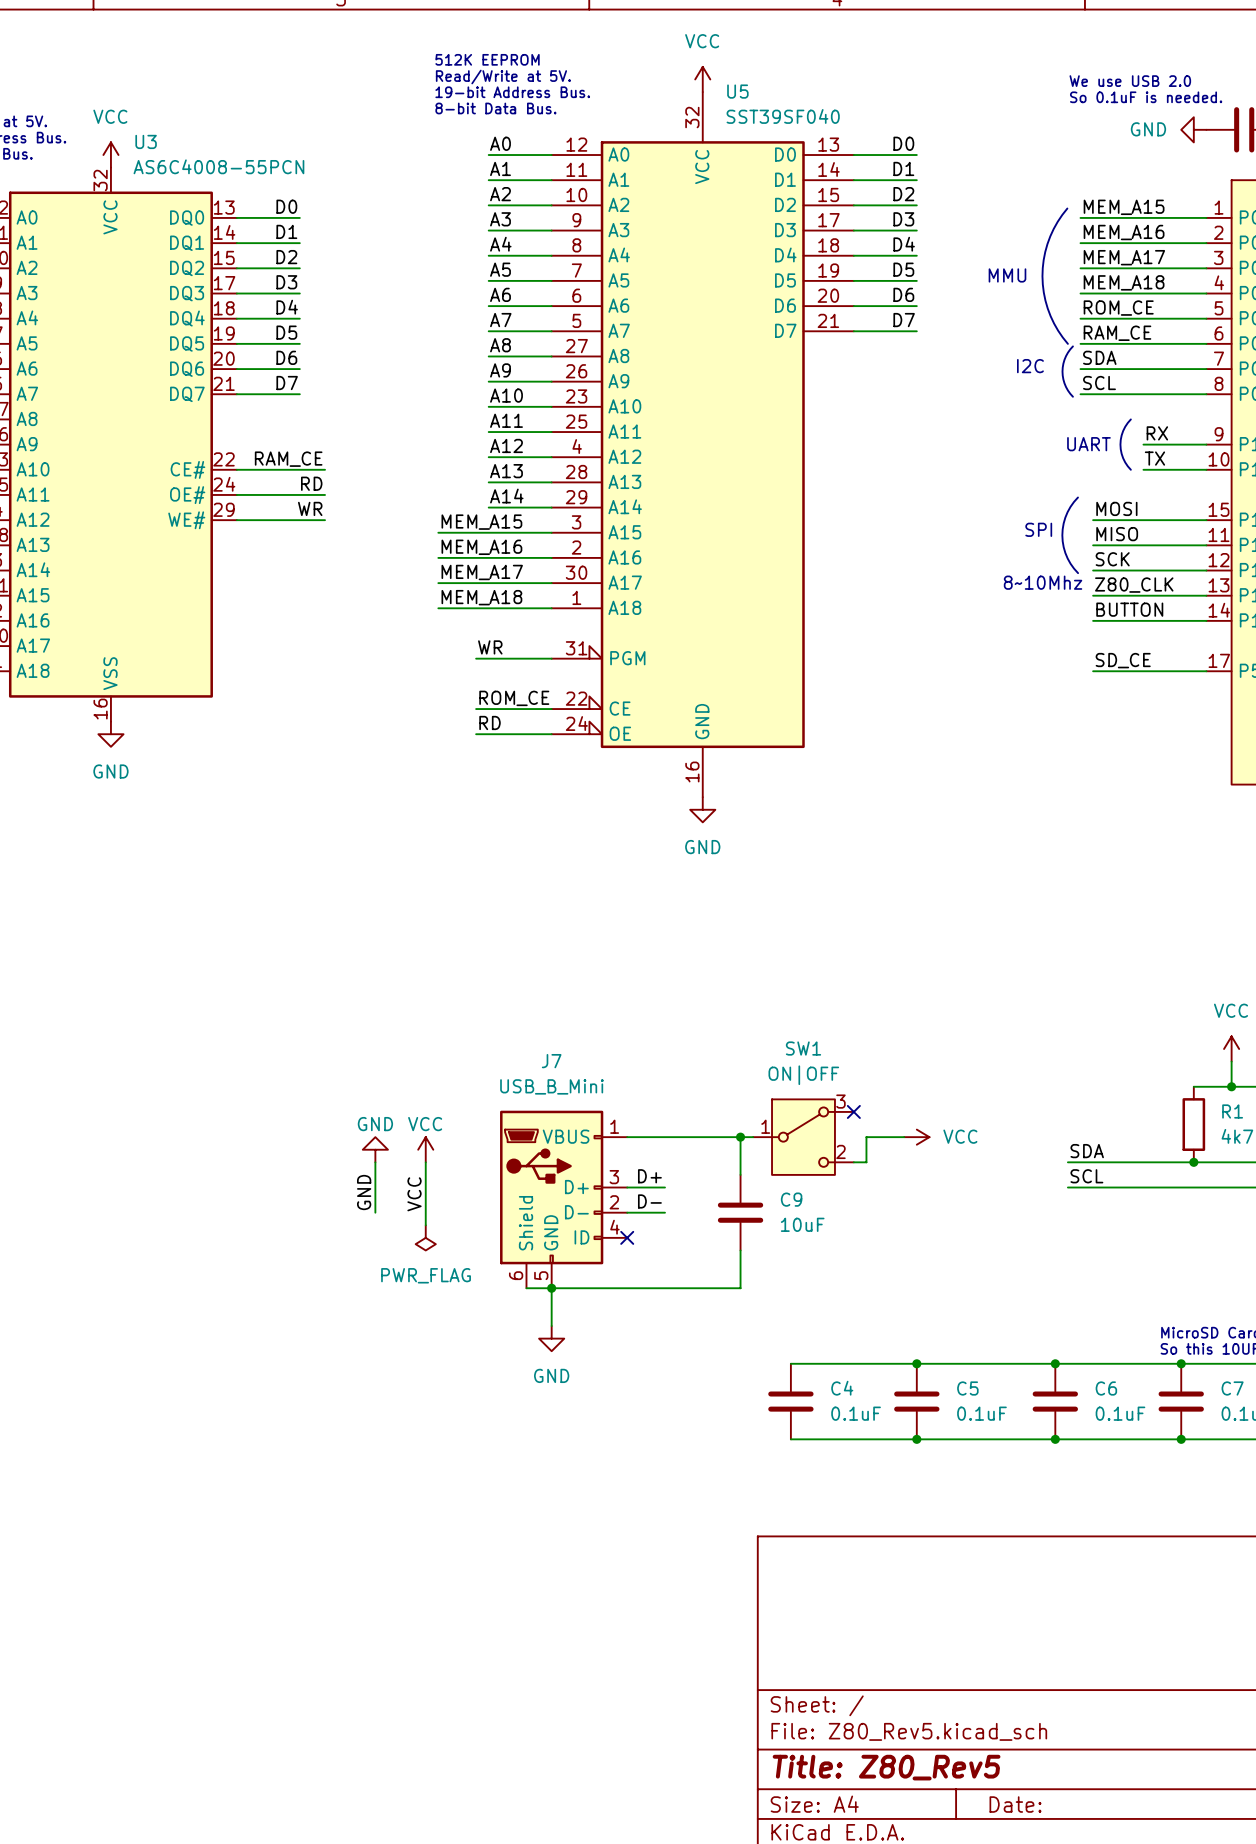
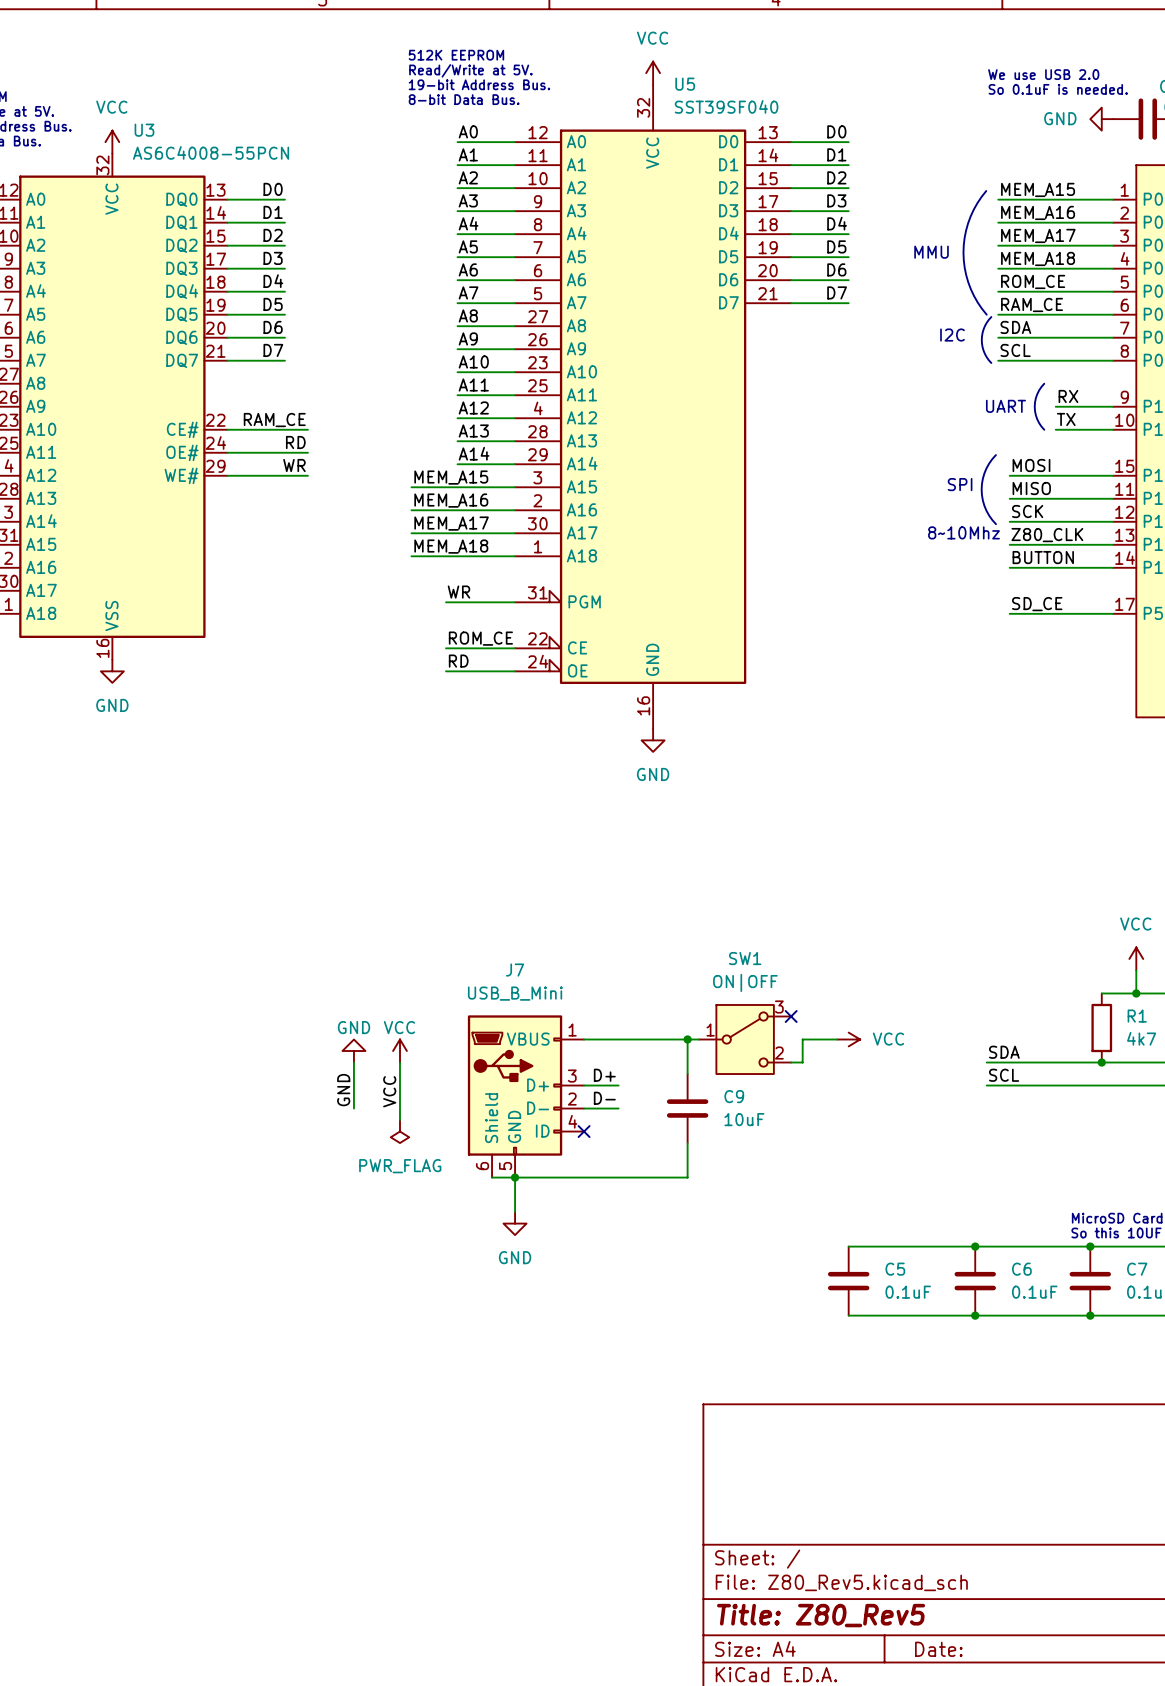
wire: (790, 1363) (916, 1363) -> none
junction: (916, 1363) -> none
C4: 0.1uF (790, 1401) -> none
wire: (790, 1439) (916, 1439) -> none
junction: (916, 1439) -> none

